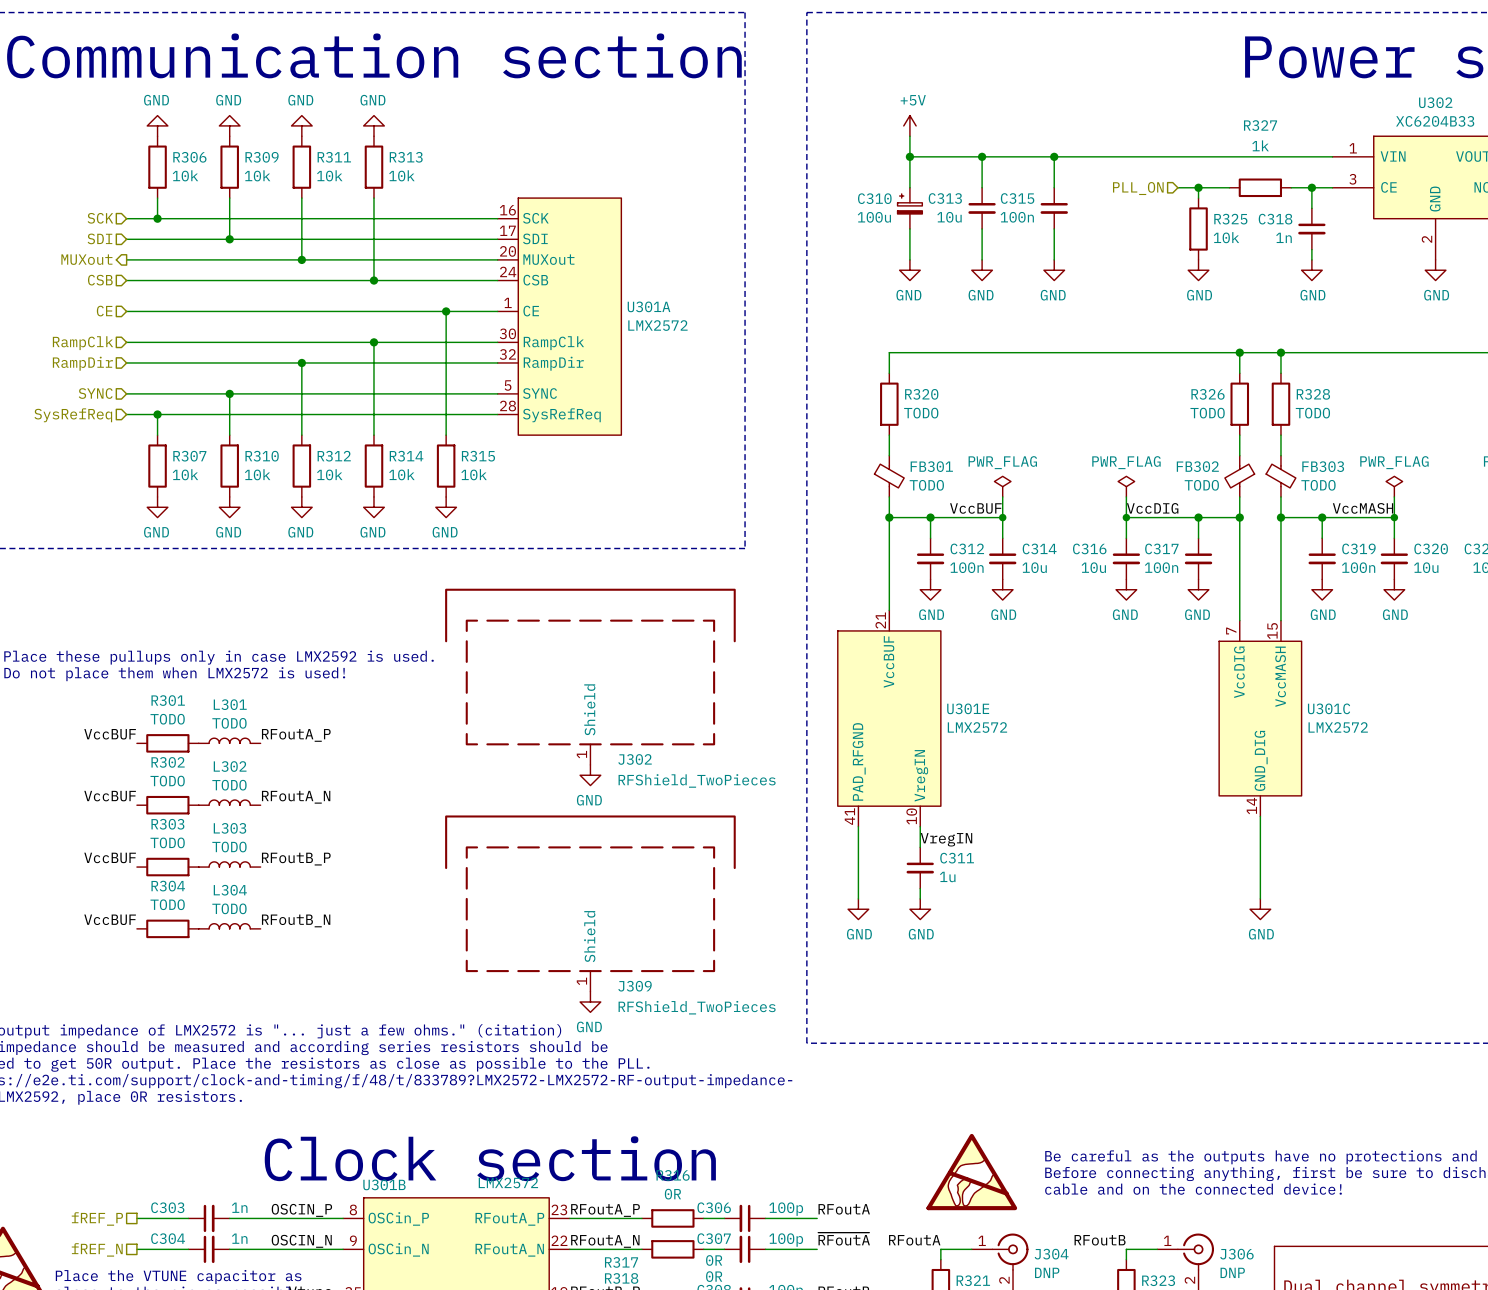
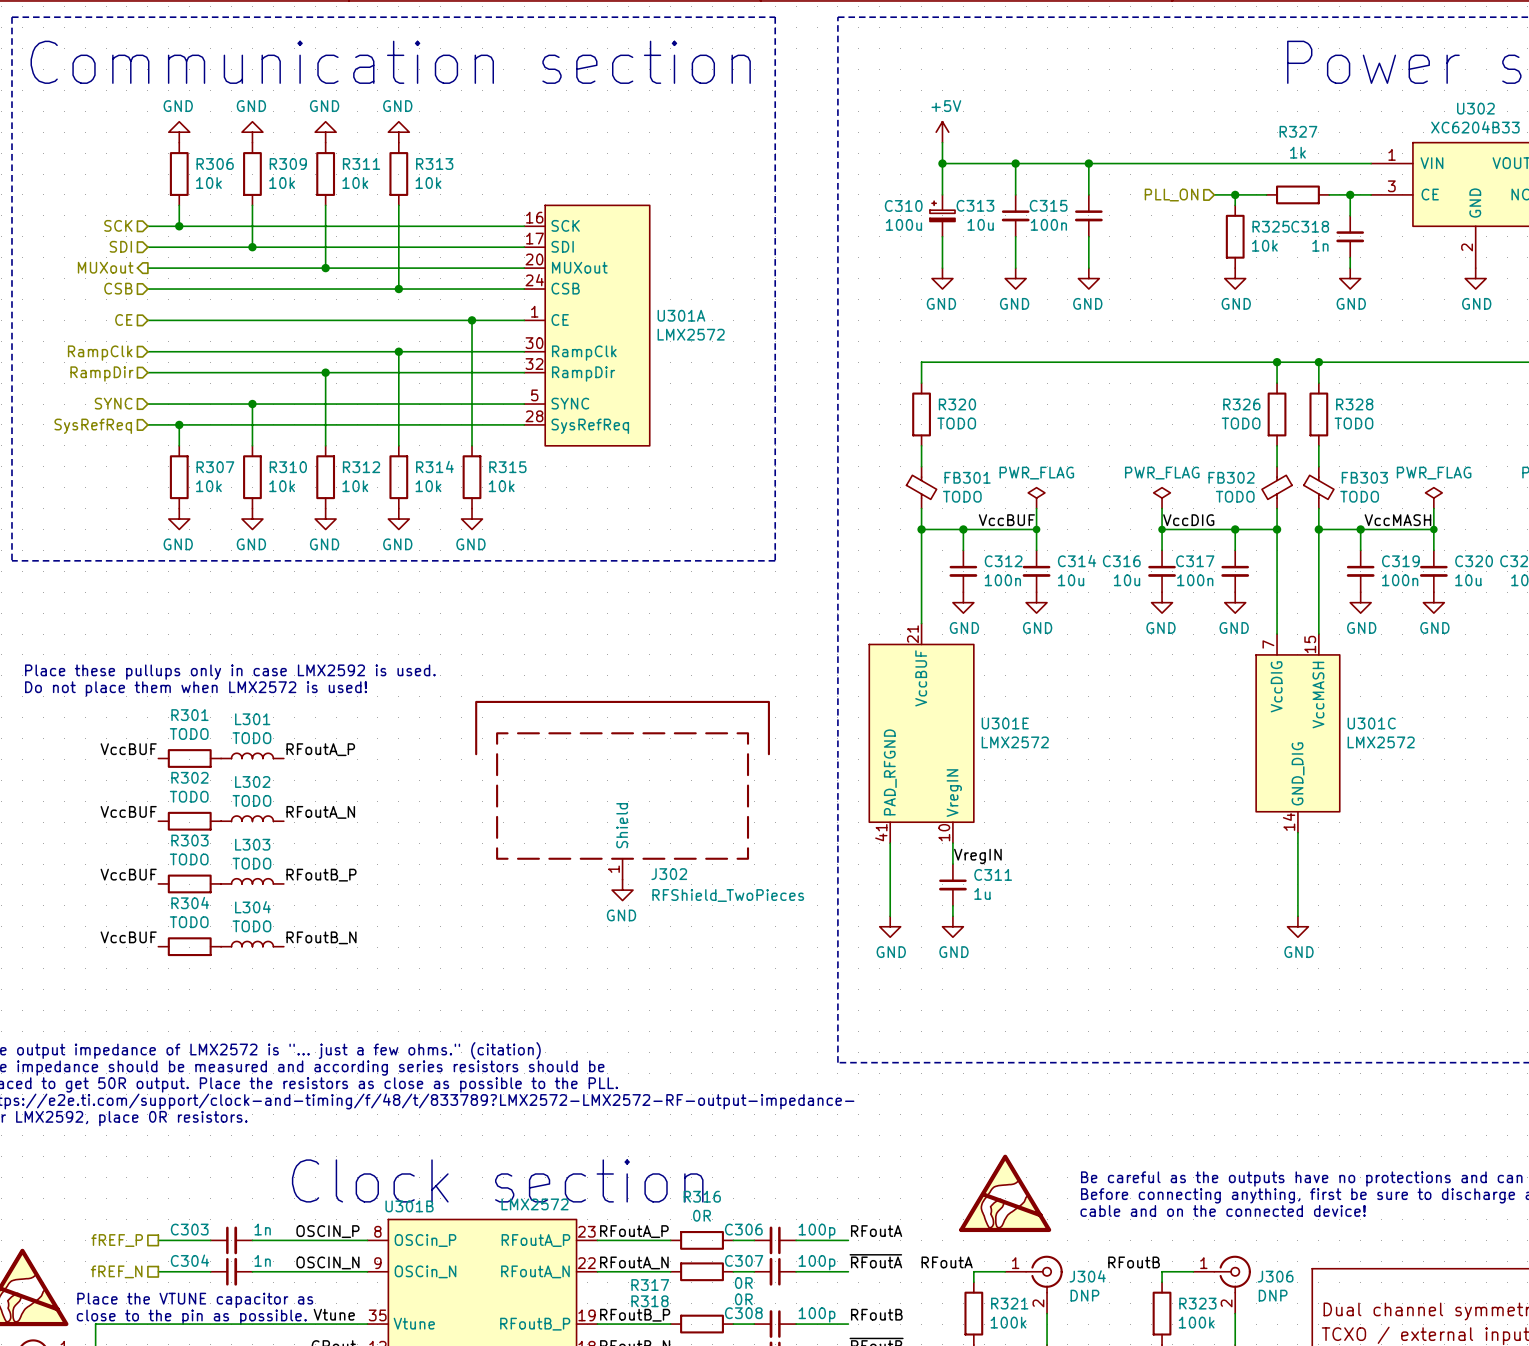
J302 position: (590, 676) -> (622, 790)
power symbol: GND (590, 775) -> none
power symbol: none -> GND (622, 890)
J309: RFShield_TwoPieces (590, 903) -> none
power symbol: GND (590, 1002) -> none

